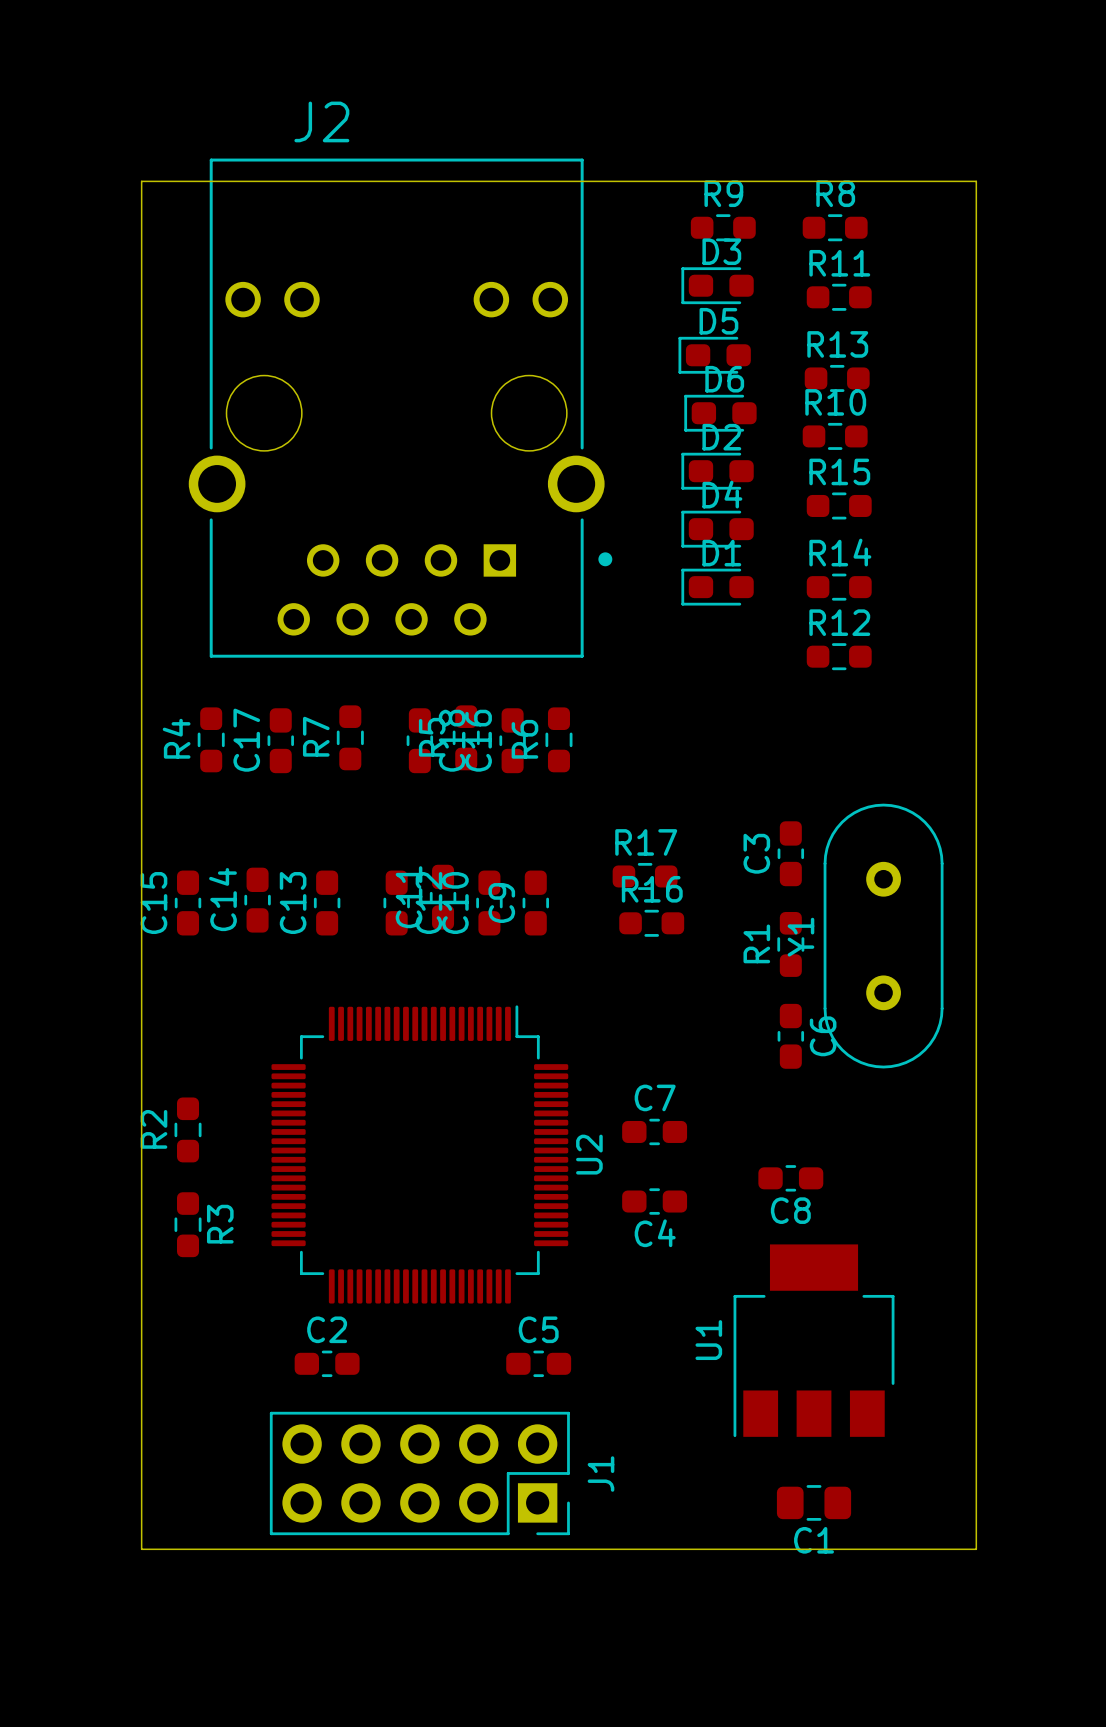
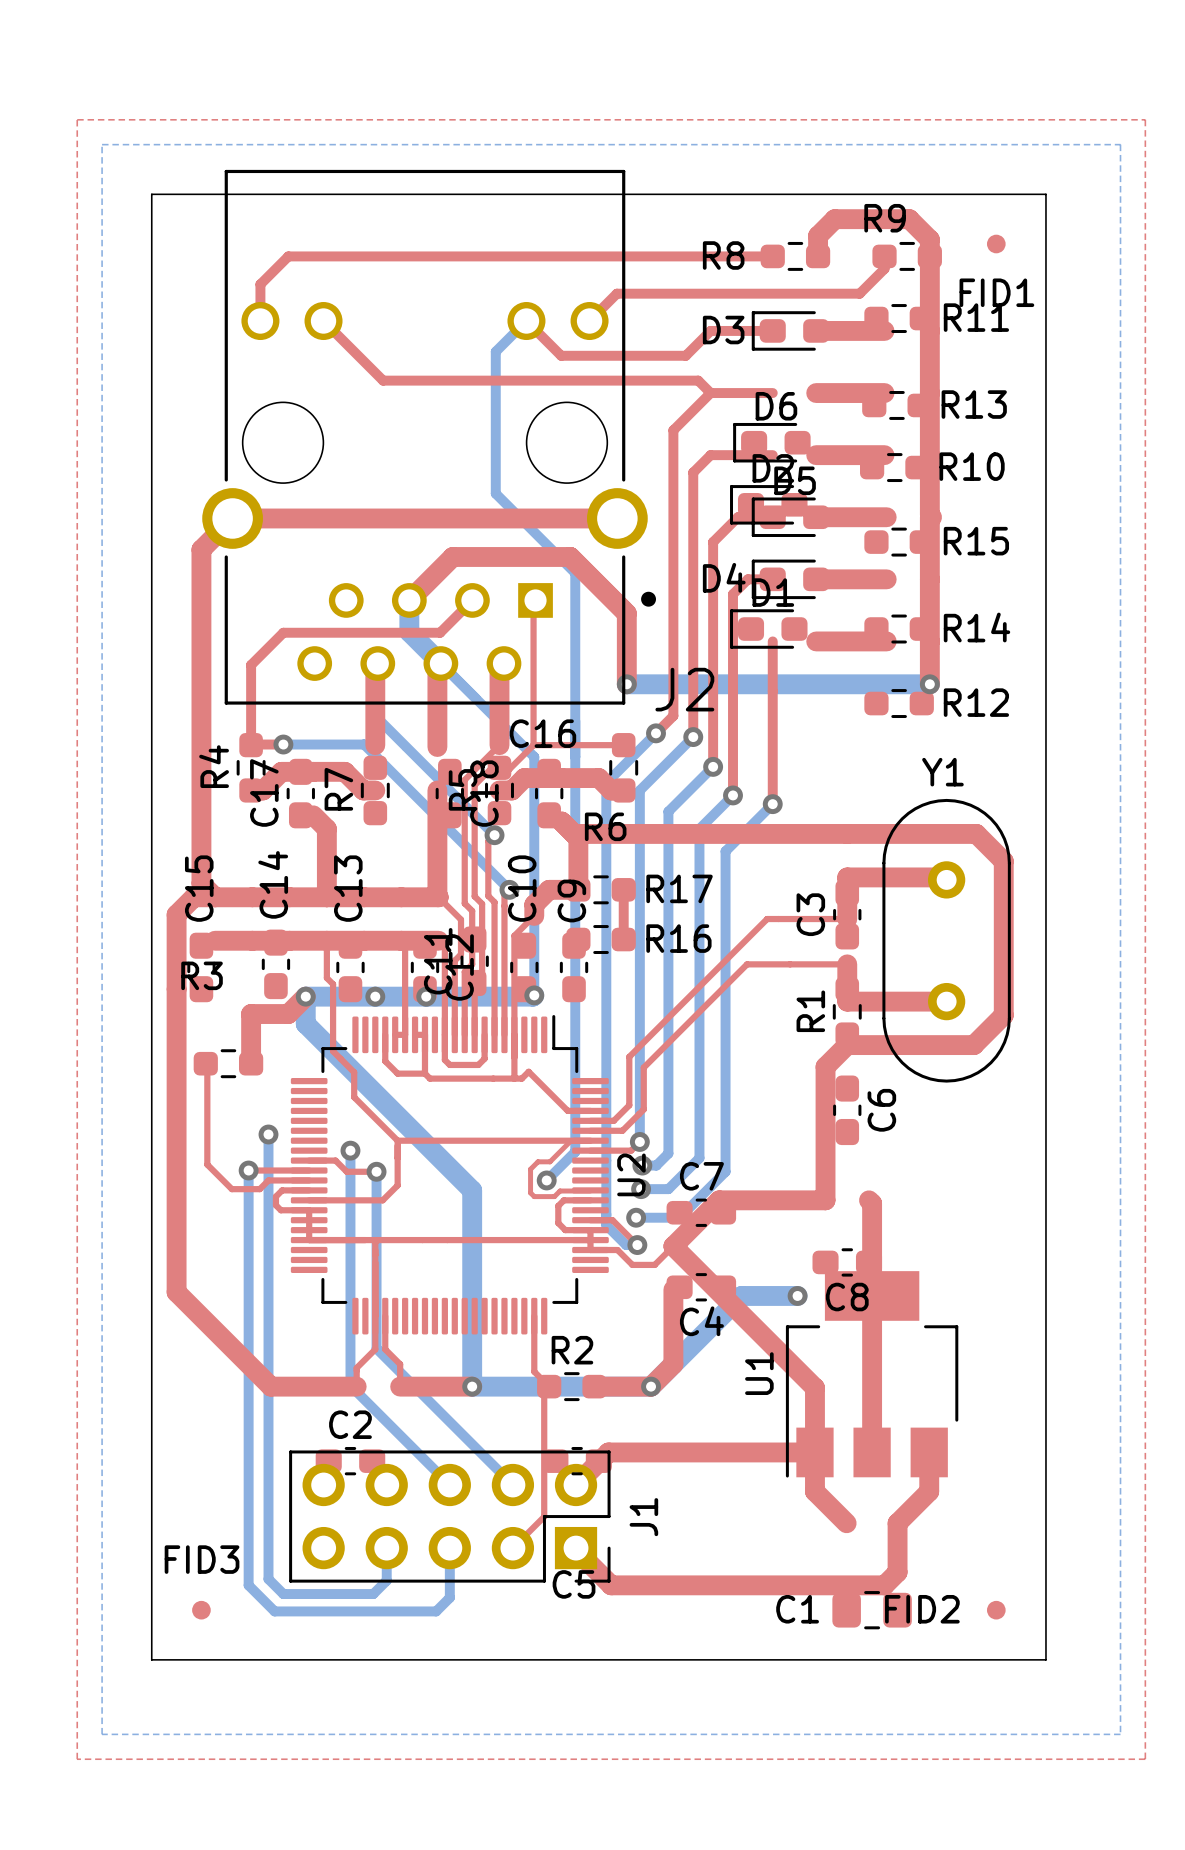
top zone outline: none -> (77, 119) (77, 1759) (1145, 1759) (1145, 119) (77, 119)
J2 name position: J2 (321, 121) -> J2 (684, 689)
bottom zone outline: none -> (102, 144) (102, 1734) (1120, 1734) (1120, 144) (102, 144)
R9 name position: R9 (723, 193) -> R9 (885, 218)
R8 name position: R8 (835, 193) -> R8 (723, 255)
R9 position: (723, 227) -> (907, 256)
R8 position: (835, 227) -> (795, 256)
FID1: none -> (996, 244)
top track: none -> (772, 256) (288, 256) (260, 284) (260, 321)
top track: none -> (818, 256) (818, 235) (834, 219) (909, 219) (929, 239) (929, 515) (932, 517)
top track: none -> (884, 256) (884, 268) (859, 293) (616, 293) (589, 321)
D3 name position: D3 (721, 251) -> D3 (723, 330)
R11 name position: R11 (839, 263) -> R11 (976, 317)
D3 position: (717, 285) -> (790, 330)
top track: none -> (323, 321) (383, 380) (698, 380) (710, 393)
top track: none -> (526, 321) (561, 355) (685, 355) (710, 330) (772, 330)
bottom track: none -> (526, 321) (495, 351) (495, 493) (575, 573) (575, 1151) (546, 1180)
top track: none -> (816, 330) (884, 330)
R13 name position: R13 (837, 344) -> R13 (974, 404)
D5 position: (714, 355) -> (790, 517)
top track: none -> (710, 393) (772, 393)
top track: none -> (710, 393) (673, 430) (673, 715) (656, 733)
top track: none -> (816, 393) (884, 393)
R10 name position: R10 (835, 402) -> R10 (972, 466)
top track: none -> (772, 455) (710, 455) (693, 472) (693, 737)
top track: none -> (816, 455) (884, 455)
R15 name position: R15 (839, 471) -> R15 (976, 541)
top track: none -> (772, 517) (737, 517) (713, 542) (713, 766)
top track: none -> (816, 517) (886, 517)
top track: none -> (929, 517) (929, 684)
top track: none -> (617, 518) (232, 518) (201, 549) (201, 883) (215, 897)
D4 name position: D4 (722, 494) -> D4 (724, 577)
D4 position: (717, 529) -> (790, 579)
top track: none -> (772, 579) (747, 579) (733, 594) (733, 795)
top track: none -> (816, 579) (886, 579)
R14 name position: R14 (840, 552) -> R14 (976, 627)
top track: none -> (409, 600) (452, 556) (570, 556) (626, 613) (626, 684)
bottom track: none -> (409, 600) (409, 632) (534, 756) (534, 995) (305, 996) (305, 1023) (472, 1190) (472, 1386) (651, 1386) (741, 1295) (797, 1295)
top track: none -> (472, 600) (440, 632) (283, 632) (251, 665) (251, 745) (283, 744)
top track: none -> (535, 600) (533, 602) (533, 745)
top track: none -> (772, 641) (772, 804)
top track: none -> (816, 641) (886, 641)
top track: none -> (377, 663) (375, 666) (375, 745) (378, 748)
bottom track: none -> (377, 663) (377, 718) (494, 835) (407, 748) (405, 748)
top track: none -> (440, 663) (437, 667) (437, 747)
top track: none -> (503, 663) (499, 668) (499, 745) (464, 779) (464, 903) (472, 910) (472, 964) (464, 971) (464, 1034)
R12 name position: R12 (839, 622) -> R12 (976, 702)
bottom track: none -> (626, 684) (929, 684)
via: none -> (626, 684)
via: none -> (929, 684)
bottom track: none -> (656, 733) (606, 783) (606, 1225) (626, 1245) (637, 1245)
via: none -> (656, 733)
bottom track: none -> (693, 737) (639, 790) (639, 1141)
via: none -> (693, 737)
via: none -> (283, 744)
bottom track: none -> (363, 744) (283, 744) (364, 744) (509, 889)
top track: none -> (533, 745) (623, 745)
top track: none -> (533, 745) (509, 769) (490, 769) (474, 785) (474, 896) (482, 903) (482, 974) (474, 981) (474, 1034)
bottom track: none -> (713, 766) (668, 811) (668, 1153) (656, 1165) (642, 1165)
via: none -> (713, 766)
top track: none -> (251, 790) (262, 790) (281, 771) (344, 771) (363, 790) (375, 790)
top track: none -> (437, 790) (438, 897)
top track: none -> (499, 790) (511, 790) (524, 778) (598, 778) (611, 790) (623, 790)
R4 position: (211, 739) -> (251, 767)
R6 name rotation: 0° (524, 739) -> 90° clockwise (605, 826)
R6 position: (558, 739) -> (623, 767)
C16 name rotation: 0° (478, 740) -> 90° clockwise (542, 733)
bottom track: none -> (733, 795) (699, 828) (699, 1158) (668, 1189) (641, 1189)
via: none -> (733, 795)
bottom track: none -> (772, 804) (725, 851) (725, 1171) (679, 1217) (636, 1217)
via: none -> (772, 804)
top track: none -> (313, 815) (326, 828) (326, 897)
top track: none -> (561, 821) (578, 838) (578, 889) (549, 889) (534, 904) (534, 915) (514, 935) (514, 1078)
top track: none -> (574, 833) (976, 833) (1003, 861) (1003, 1015) (973, 1045) (847, 1045) (825, 1066) (825, 1200) (719, 1200) (673, 1246)
top track: none -> (494, 835) (488, 841) (488, 896) (494, 902) (494, 1034)
via: none -> (494, 835)
top track: none -> (946, 879) (944, 877) (847, 877) (847, 919) (767, 919) (629, 1056) (629, 1105) (613, 1120) (590, 1120)
top track: none -> (509, 889) (504, 894) (504, 1034)
via: none -> (509, 889)
top track: none -> (623, 889) (623, 939)
top track: none -> (438, 897) (193, 897) (176, 914) (176, 1292) (270, 1386) (356, 1386) (356, 1368) (375, 1349) (375, 1242) (377, 1240)
top track: none -> (438, 897) (461, 919) (461, 954) (454, 960) (454, 1034)
R17 name position: R17 (646, 842) -> R17 (679, 888)
R17 position: (645, 876) -> (601, 889)
top track: none -> (215, 940) (438, 940) (444, 946) (444, 1059) (449, 1064) (478, 1064) (484, 1058) (484, 1034)
top track: none -> (326, 940) (326, 978) (333, 984) (333, 1051) (354, 1072) (354, 1097) (397, 1140)
top track: none -> (401, 940) (405, 944) (405, 1034) (395, 1034)
R16 name position: R16 (652, 889) -> R16 (678, 938)
C14 name position: C14 (222, 899) -> C14 (273, 884)
C15 name position: C15 (153, 903) -> C15 (199, 888)
C13 name position: C13 (293, 903) -> C13 (348, 888)
C10 name position: C10 (455, 903) -> C10 (522, 888)
C9 name position: C9 (501, 903) -> C9 (571, 901)
R16 position: (651, 923) -> (601, 939)
via: none -> (534, 995)
top track: none -> (305, 996) (288, 1014) (251, 1014) (251, 1063)
via: none -> (305, 996)
via: none -> (375, 996)
via: none -> (426, 996)
top track: none -> (946, 1001) (847, 1001) (847, 964) (747, 964) (643, 1067) (643, 1109) (622, 1130) (590, 1130)
Y1 position: (883, 936) -> (946, 940)
Y1 name rotation: 0° (800, 937) -> 90° clockwise (942, 772)
Y1 name position: Y1 (800, 937) -> Y1 (942, 772)
top track: none -> (385, 1034) (385, 1061) (397, 1073) (424, 1073)
top track: none -> (415, 1034) (424, 1034) (424, 1073)
top track: none -> (205, 1063) (207, 1065) (207, 1164) (231, 1189) (259, 1189) (268, 1180) (309, 1180)
top track: none -> (424, 1073) (429, 1078) (521, 1078) (528, 1071) (567, 1110) (590, 1110)
bottom track: none -> (268, 1134) (268, 1579) (283, 1594) (373, 1594) (386, 1580) (386, 1548)
via: none -> (268, 1134)
top track: none -> (397, 1140) (590, 1140) (570, 1141) (550, 1161) (538, 1161) (530, 1169) (530, 1192) (534, 1196) (554, 1196) (560, 1191) (590, 1191)
top track: none -> (397, 1140) (397, 1185) (382, 1200) (309, 1200)
top track: none -> (639, 1141) (631, 1150) (590, 1150)
via: none -> (639, 1141)
bottom track: none -> (350, 1150) (350, 1385) (449, 1484)
via: none -> (350, 1150)
top track: none -> (309, 1160) (335, 1160) (346, 1171) (376, 1171)
via: none -> (642, 1165)
top track: none -> (247, 1170) (309, 1170)
bottom track: none -> (248, 1170) (248, 1585) (274, 1611) (436, 1611) (449, 1597) (449, 1548)
via: none -> (248, 1170)
bottom track: none -> (376, 1171) (376, 1348) (512, 1484)
via: none -> (376, 1171)
via: none -> (546, 1180)
via: none -> (641, 1189)
top track: none -> (309, 1190) (282, 1190) (275, 1196) (275, 1205) (280, 1210) (309, 1210) (309, 1240) (590, 1240)
top track: none -> (590, 1200) (563, 1200) (558, 1205) (558, 1223) (565, 1230) (590, 1230) (590, 1250) (617, 1250) (632, 1264) (654, 1264) (673, 1246)
top track: none -> (869, 1200) (872, 1203) (872, 1452)
R2 rotation: 0° (188, 1129) -> 90° clockwise (571, 1386)
R2 position: (188, 1129) -> (571, 1386)
via: none -> (636, 1217)
top track: none -> (590, 1220) (612, 1220) (637, 1245)
U2 position: (419, 1154) -> (449, 1174)
via: none -> (637, 1245)
top track: none -> (673, 1246) (814, 1387) (814, 1491) (846, 1523)
top track: none -> (673, 1289) (673, 1364) (651, 1386) (594, 1386)
via: none -> (797, 1295)
R3 rotation: 0° (188, 1224) -> 90° clockwise (228, 1063)
R3 position: (188, 1224) -> (228, 1063)
R3 name position: R3 (220, 1224) -> R3 (202, 975)
top track: none -> (385, 1316) (385, 1349) (400, 1364) (400, 1386) (472, 1386)
top track: none -> (534, 1316) (534, 1371) (549, 1386) (544, 1391) (544, 1516) (512, 1548)
via: none -> (472, 1386)
via: none -> (651, 1386)
C5 name position: C5 (538, 1329) -> C5 (574, 1584)
U1 position: (814, 1340) -> (872, 1374)
top track: none -> (814, 1452) (608, 1452) (576, 1484) (574, 1483)
top track: none -> (929, 1452) (929, 1491) (897, 1523) (897, 1572) (884, 1585) (611, 1585) (576, 1548)
J1 position: (419, 1473) -> (449, 1516)
FID3: none -> (201, 1610)
FID2: none -> (996, 1610)
C1 name position: C1 (814, 1540) -> C1 (797, 1609)

